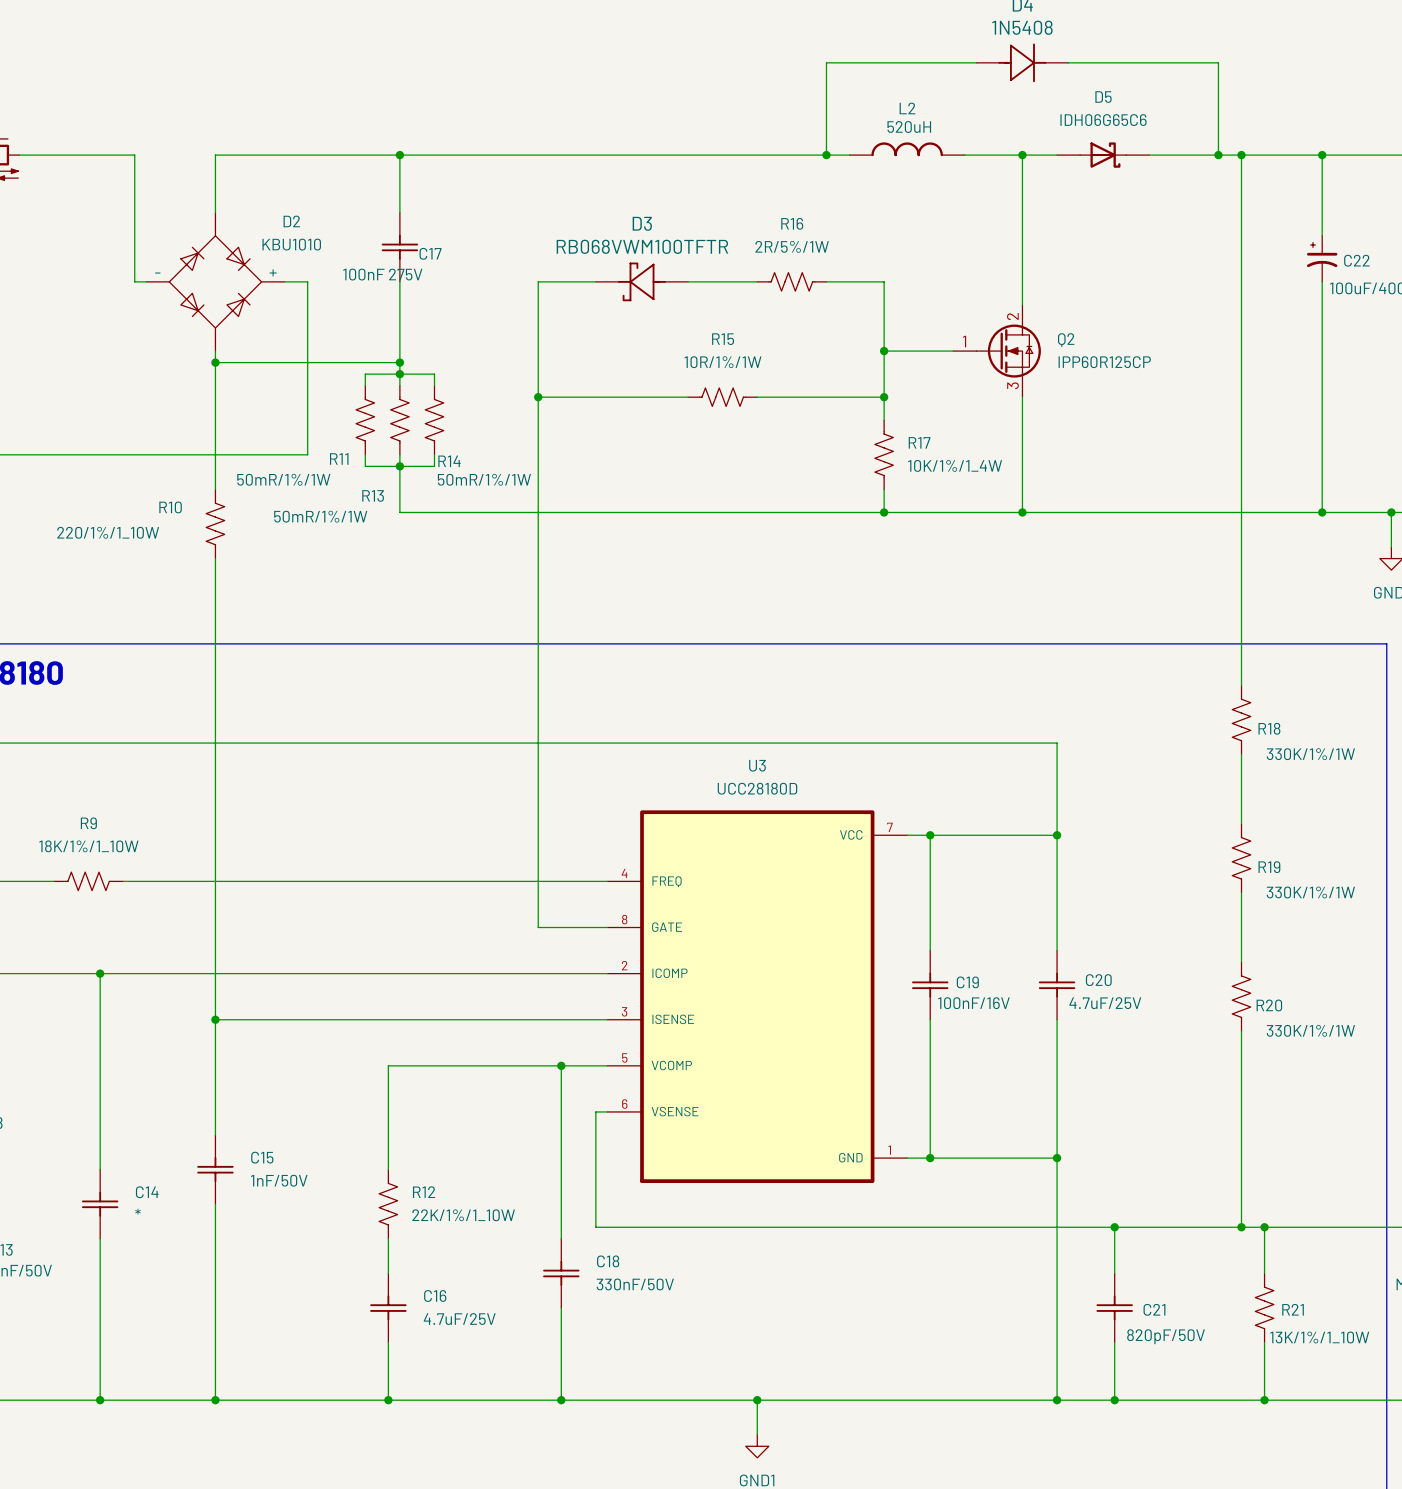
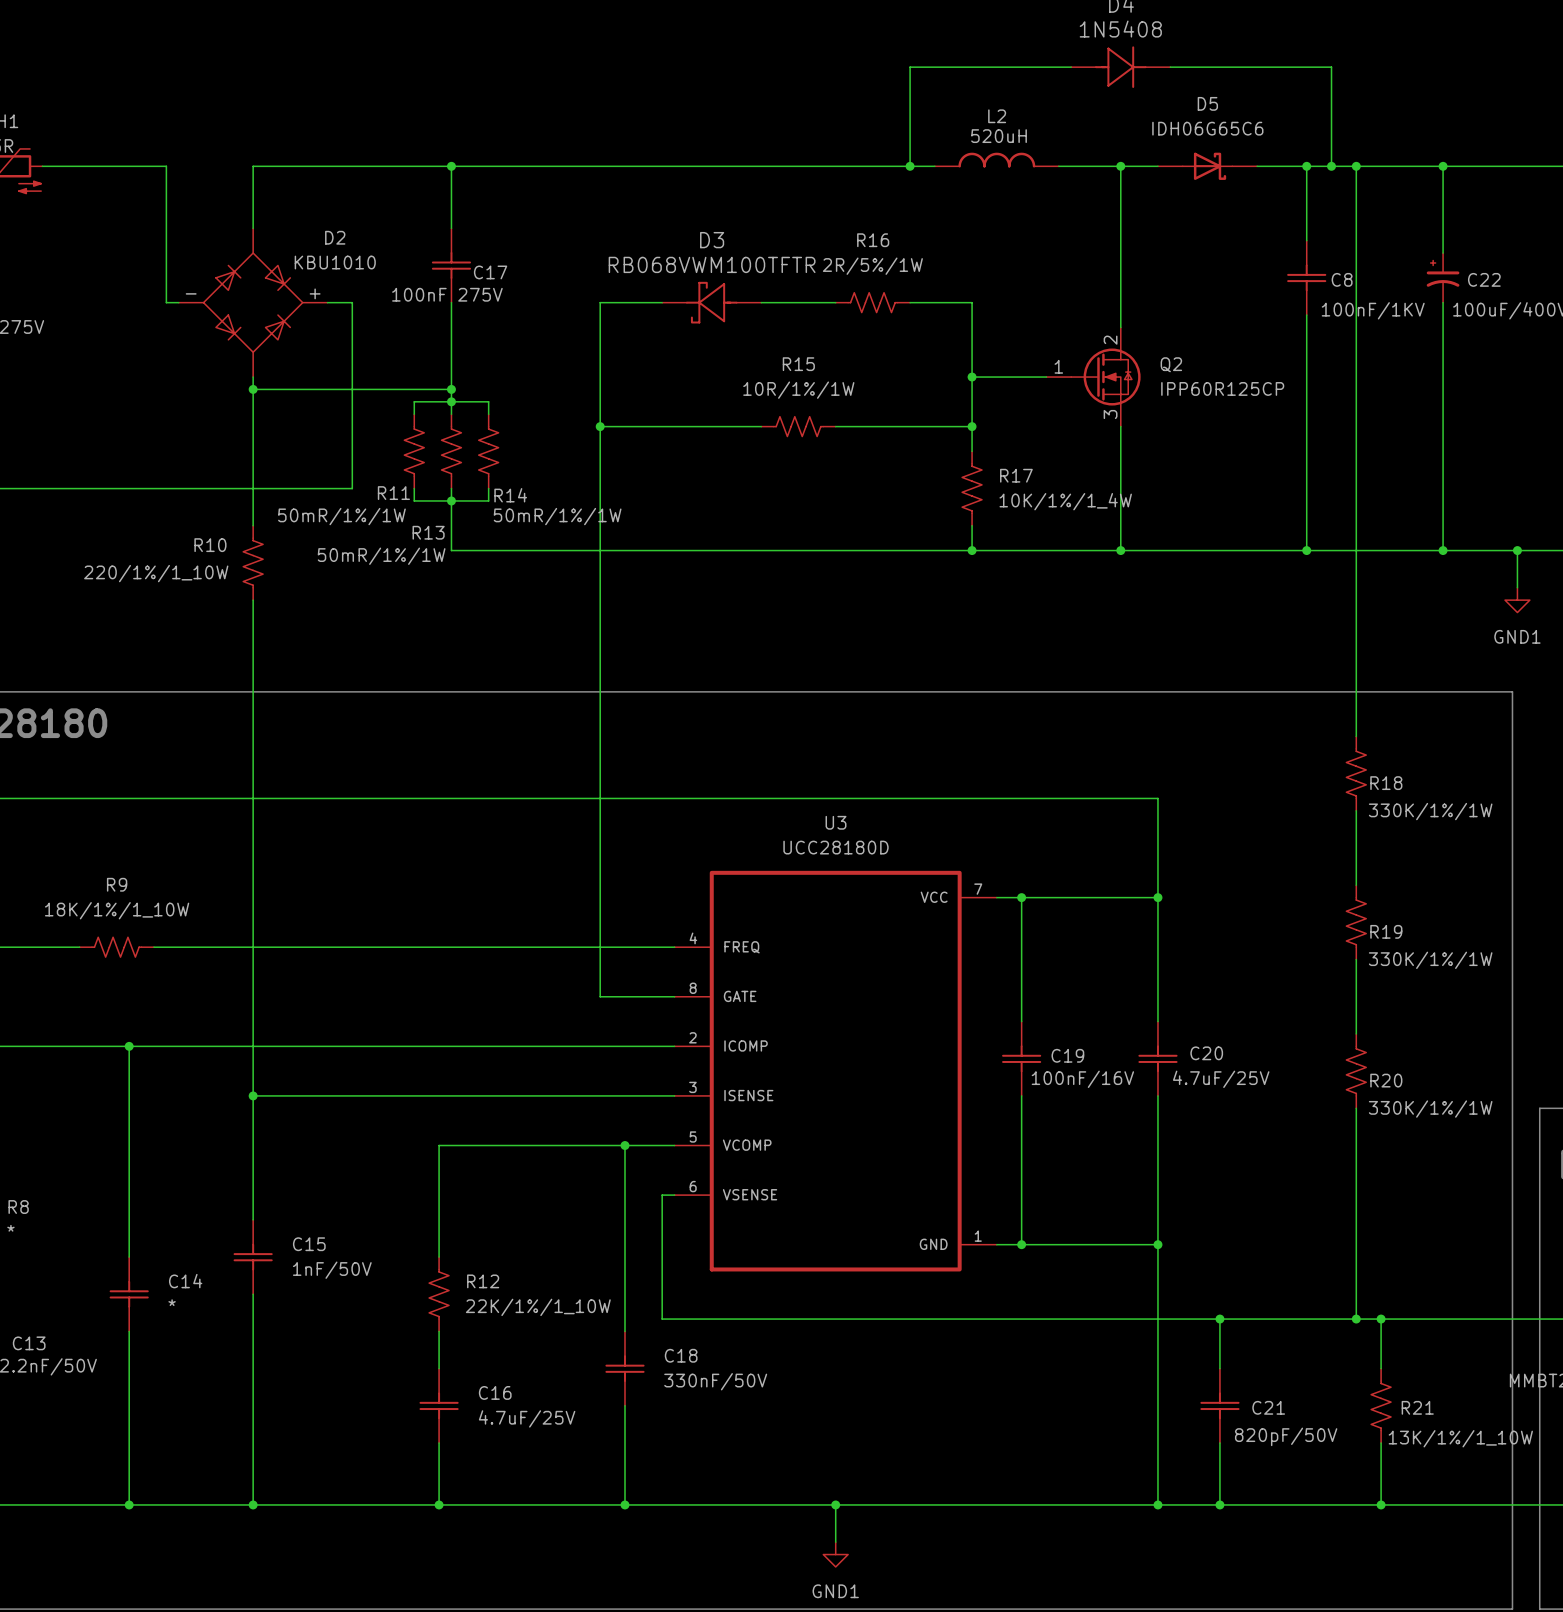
wire: none -> (1306, 166) (1306, 240)
junction: none -> (1306, 166)
C8: none -> 100nF/1KV (1306, 277)
wire: none -> (1306, 315) (1306, 550)
junction: none -> (1306, 550)

